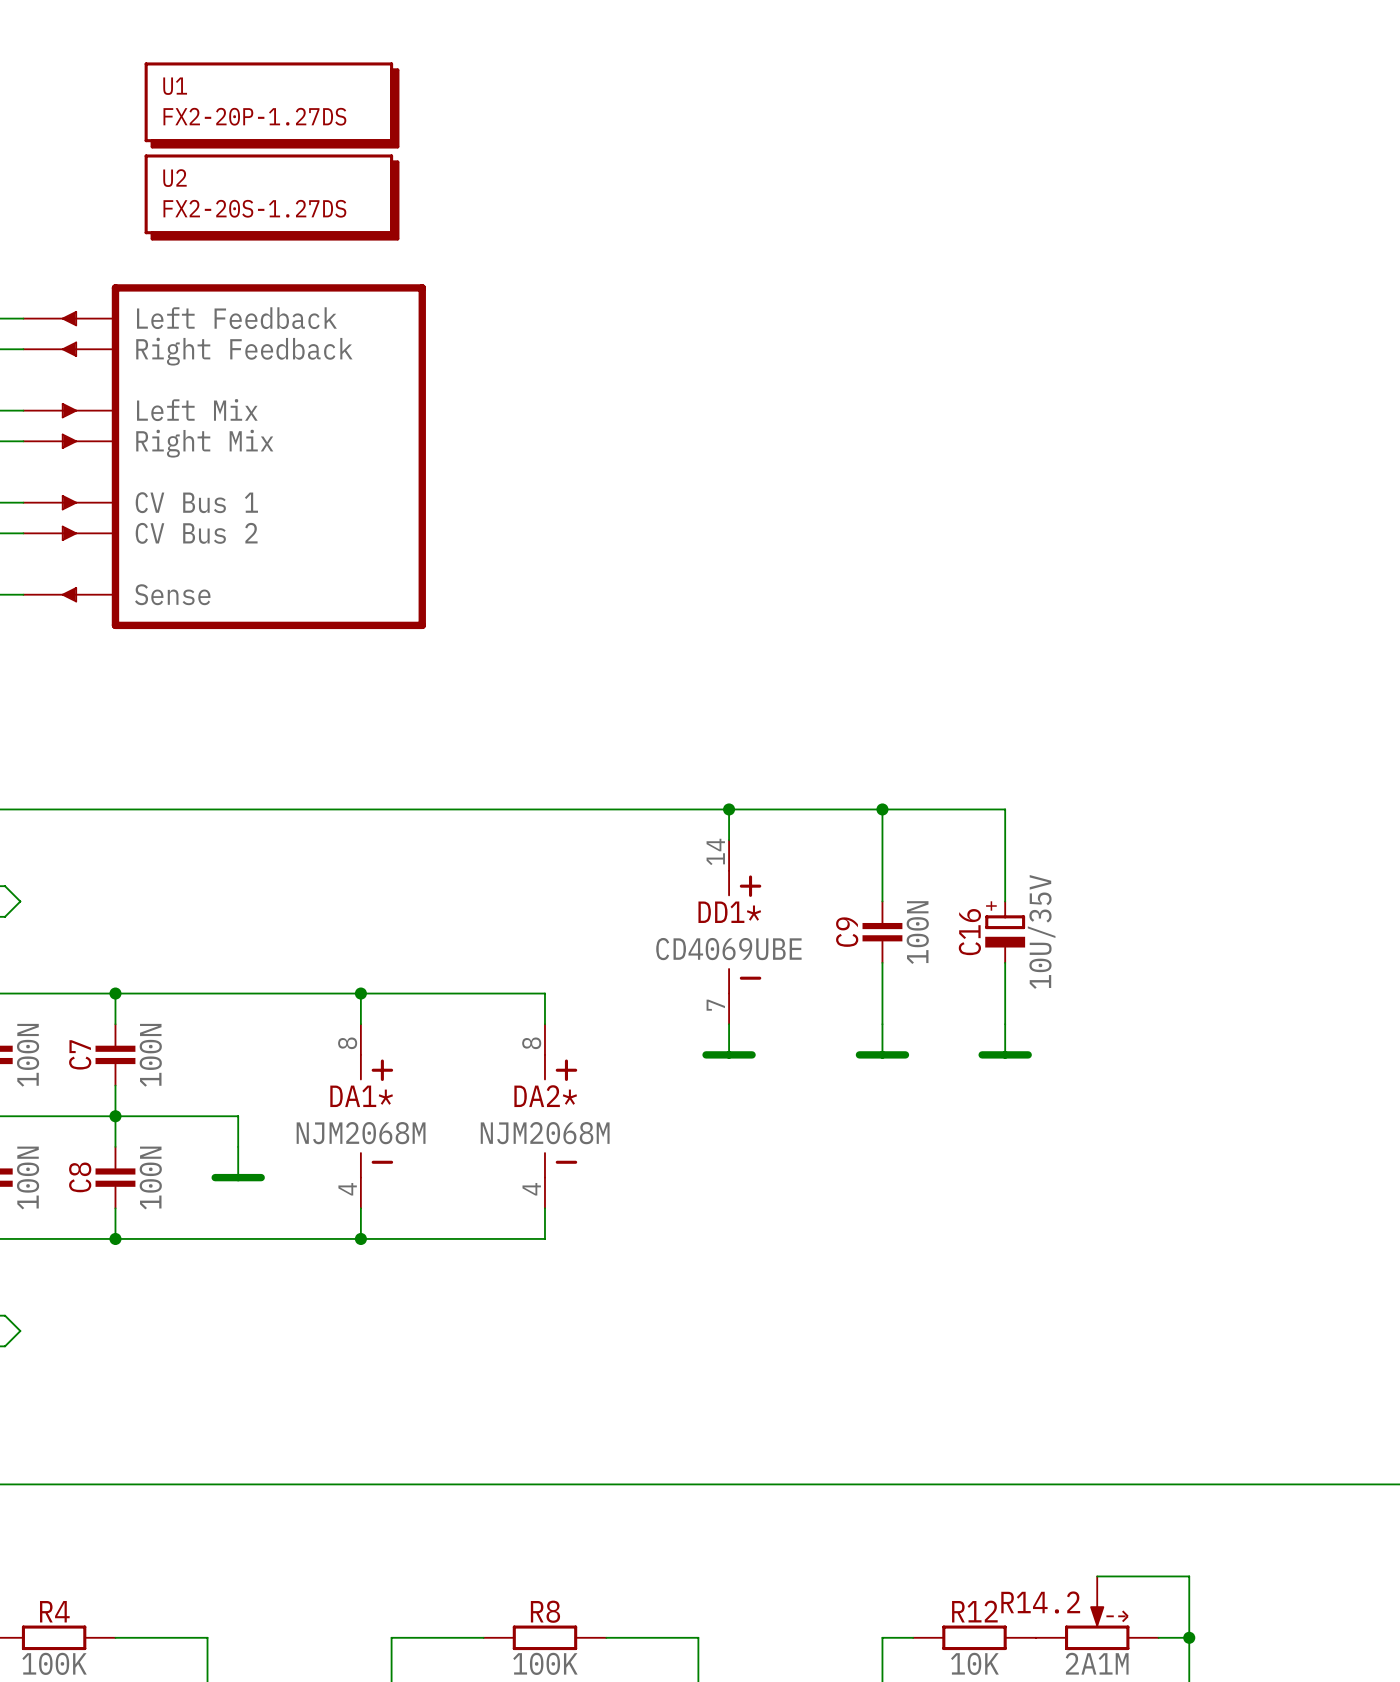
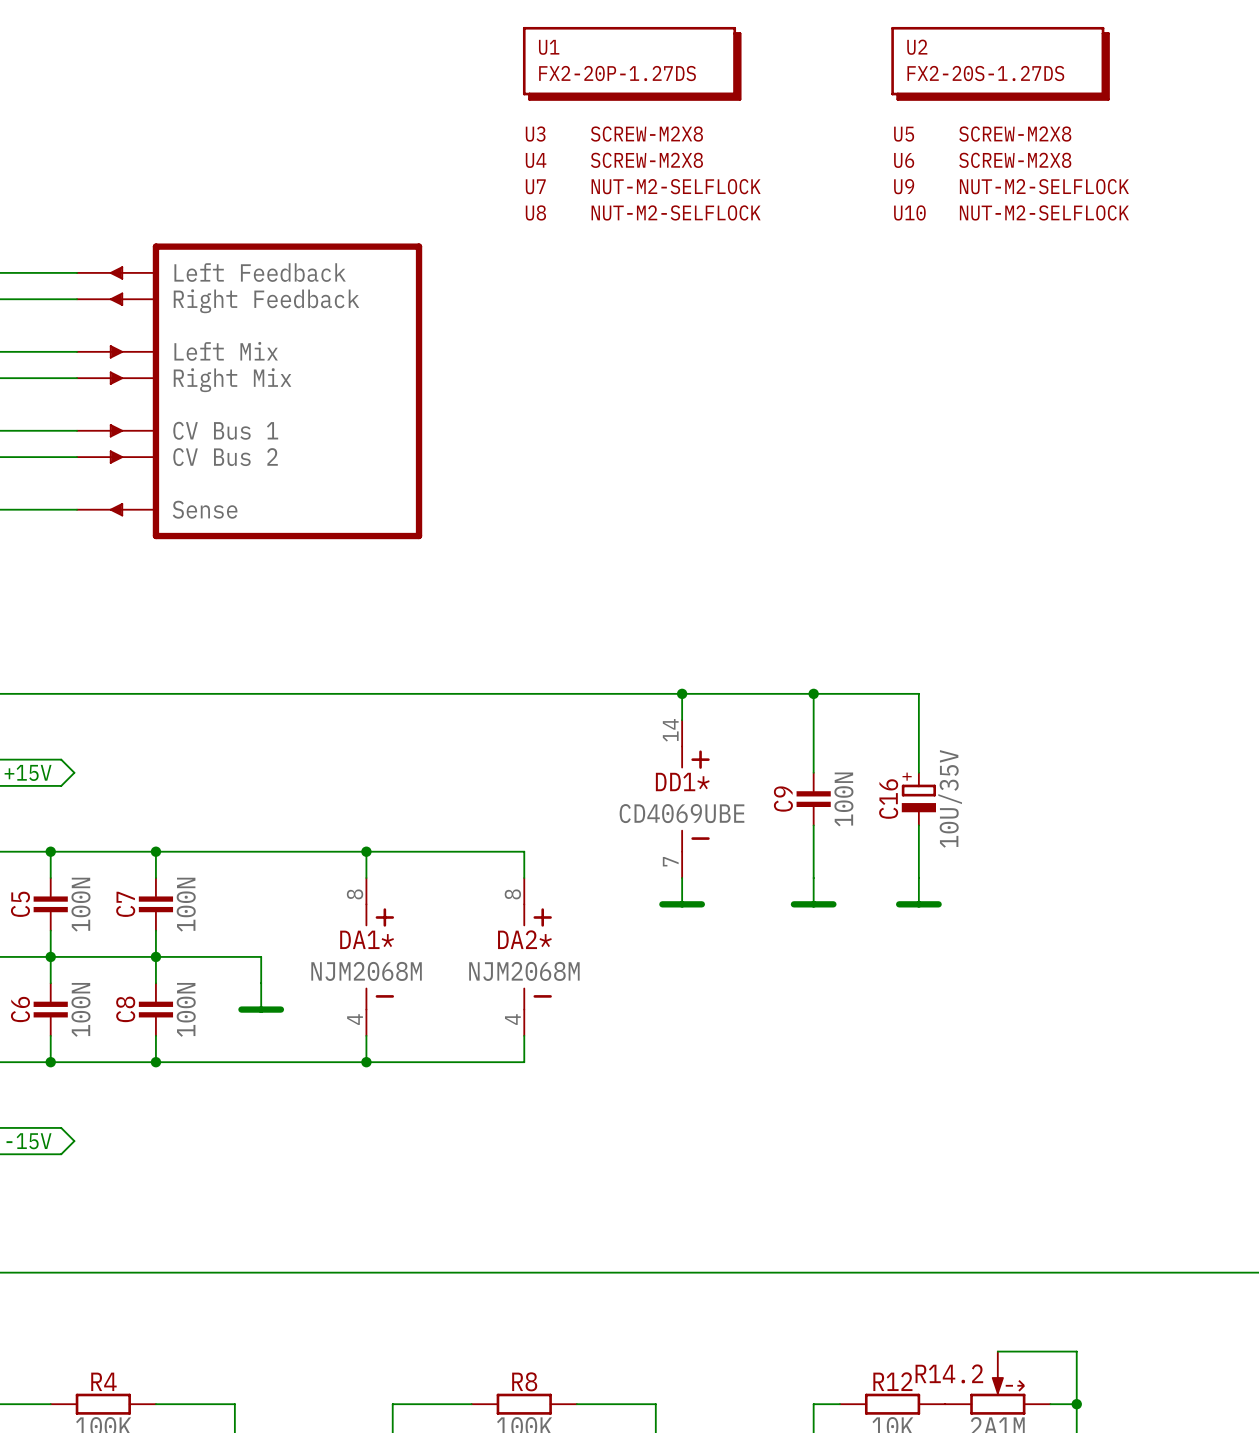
U1 position: (271, 105) -> (632, 63)
U3: none -> SCREW-M2X8 (614, 134)
U5: none -> SCREW-M2X8 (982, 134)
U4: none -> SCREW-M2X8 (614, 160)
U6: none -> SCREW-M2X8 (982, 160)
U2 position: (271, 197) -> (1000, 63)
U7: none -> NUT-M2-SELFLOCK (643, 186)
U9: none -> NUT-M2-SELFLOCK (1011, 186)
U8: none -> NUT-M2-SELFLOCK (643, 212)
U10: none -> NUT-M2-SELFLOCK (1011, 212)

